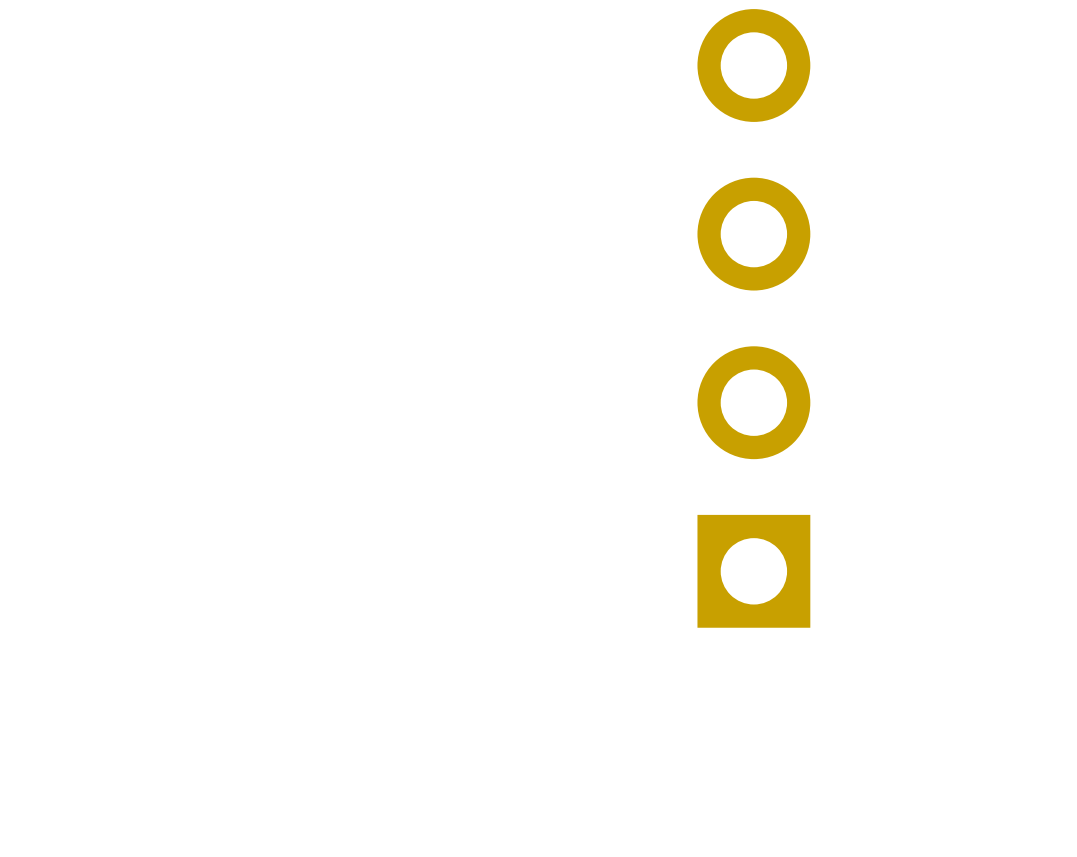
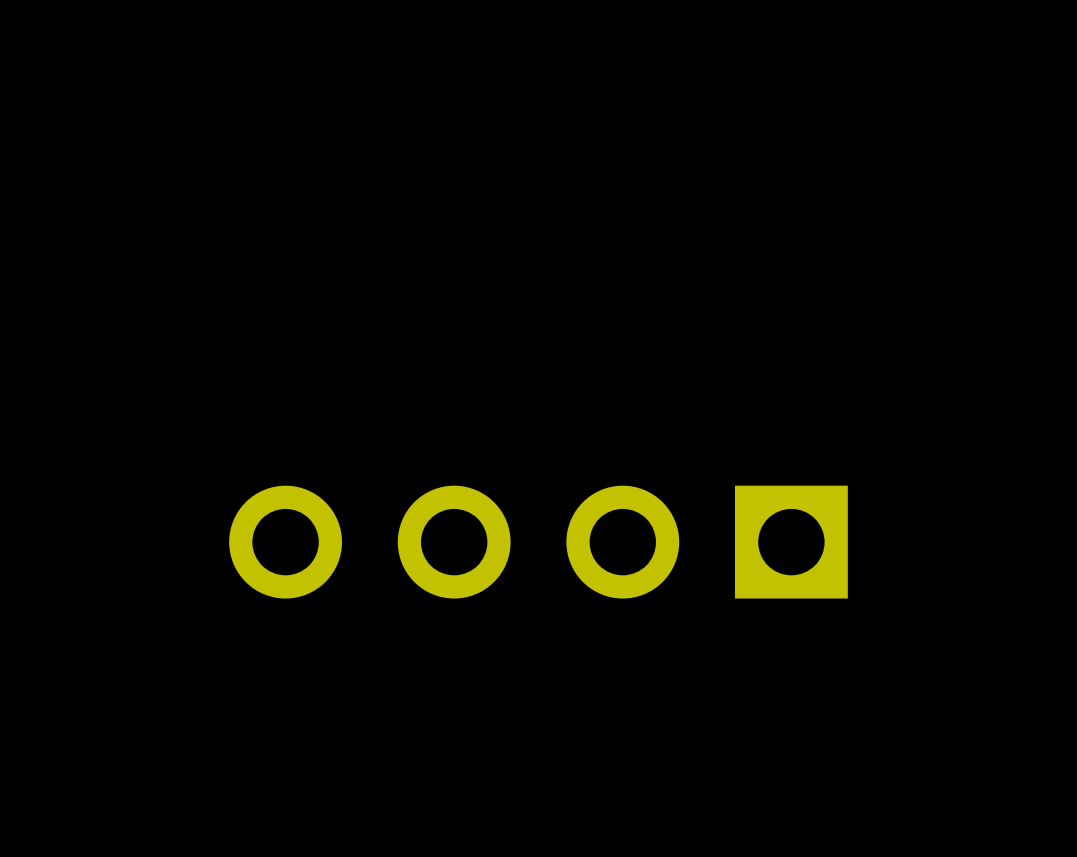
part rotation: 0° (753, 318) -> 90° counterclockwise (538, 542)

